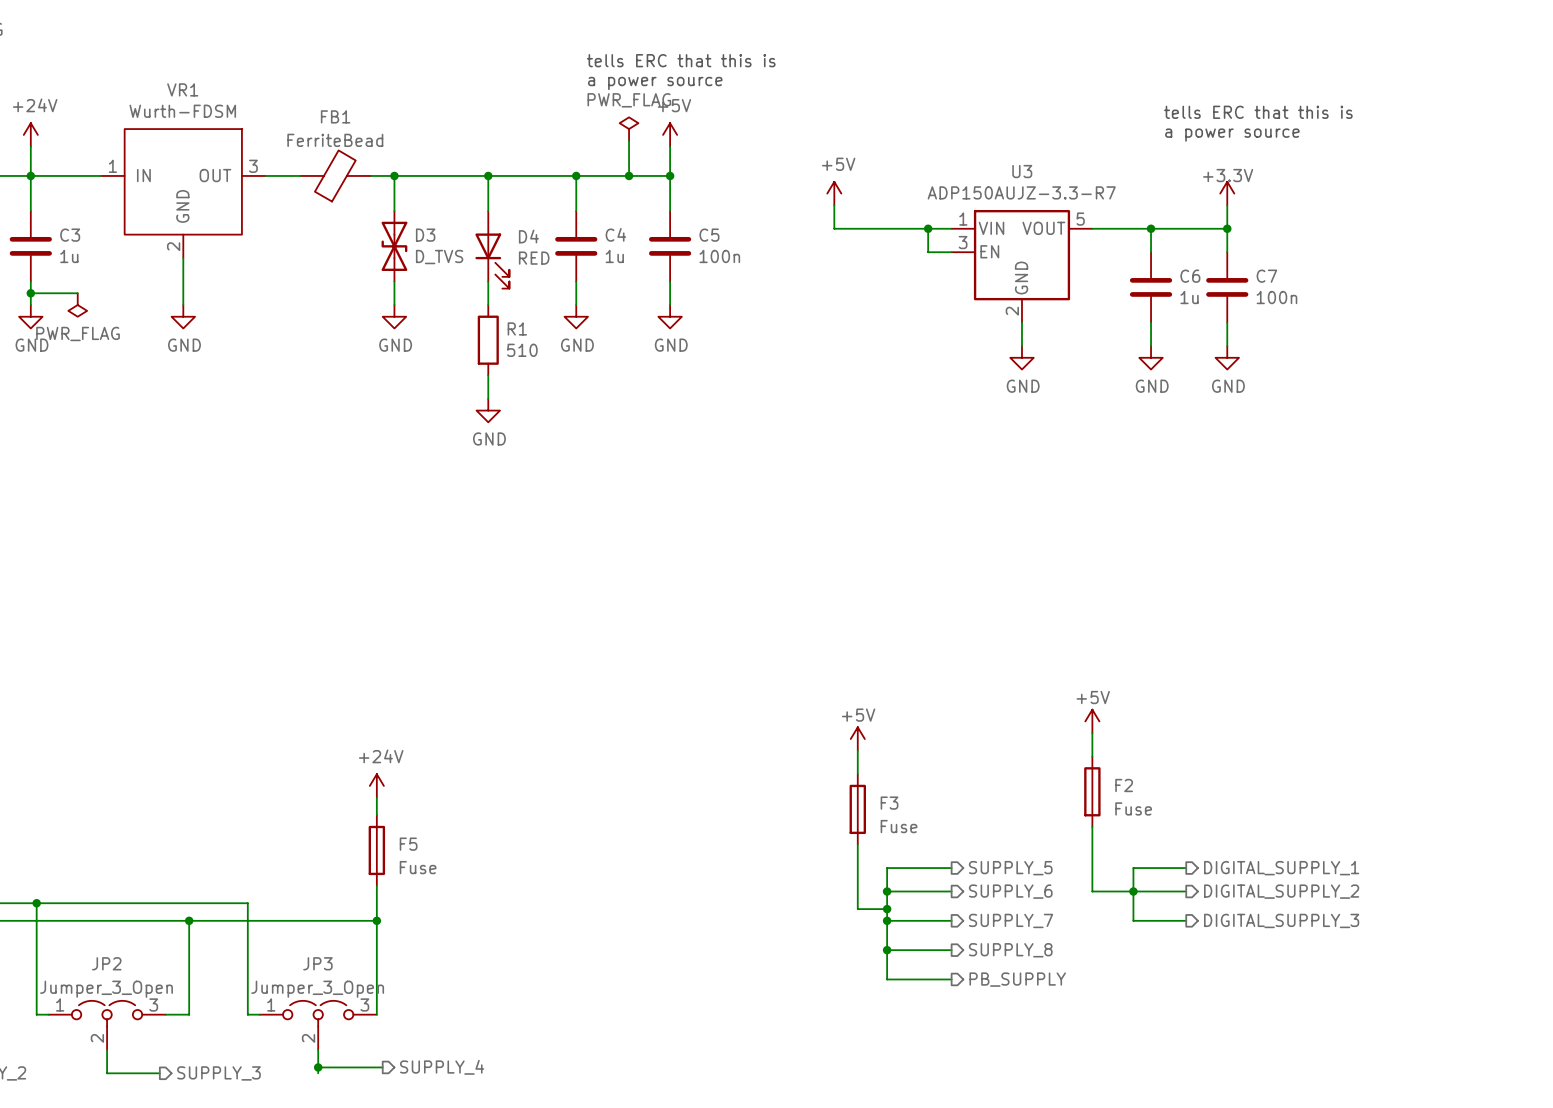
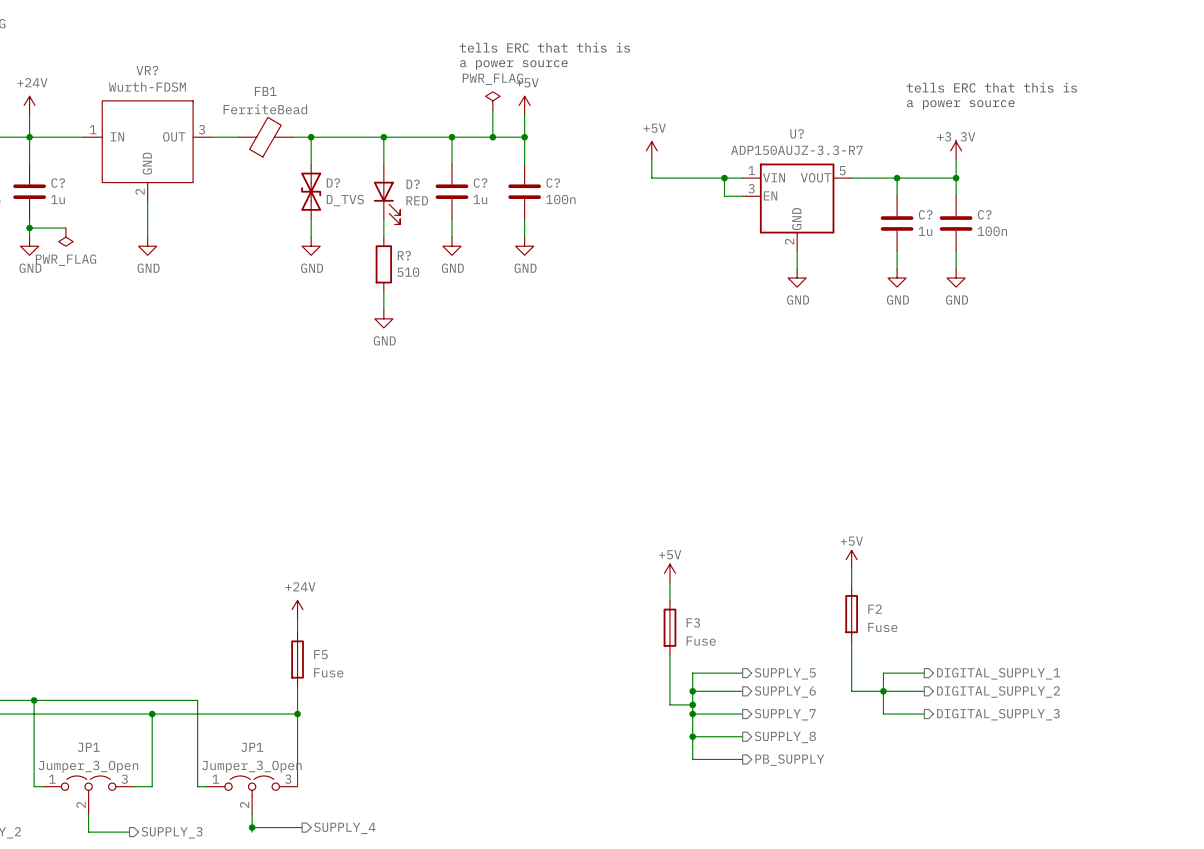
VR1 name: VR1 (182, 89) -> VR? (147, 70)
U3 name: U3 (1022, 171) -> U? (797, 133)
C4 name: C4 (615, 234) -> C? (480, 183)
C3 name: C3 (70, 235) -> C? (58, 183)
D3 name: D3 (425, 235) -> D? (333, 182)
C5 name: C5 (709, 235) -> C? (553, 183)
D4 name: D4 (528, 236) -> D? (413, 184)
C6 name: C6 (1190, 276) -> C? (925, 214)
C7 name: C7 (1266, 276) -> C? (984, 214)
R1 name: R1 (517, 328) -> R? (404, 255)
JP2 name: JP2 (106, 963) -> JP1 (88, 747)
JP3 name: JP3 (317, 963) -> JP1 (252, 747)

